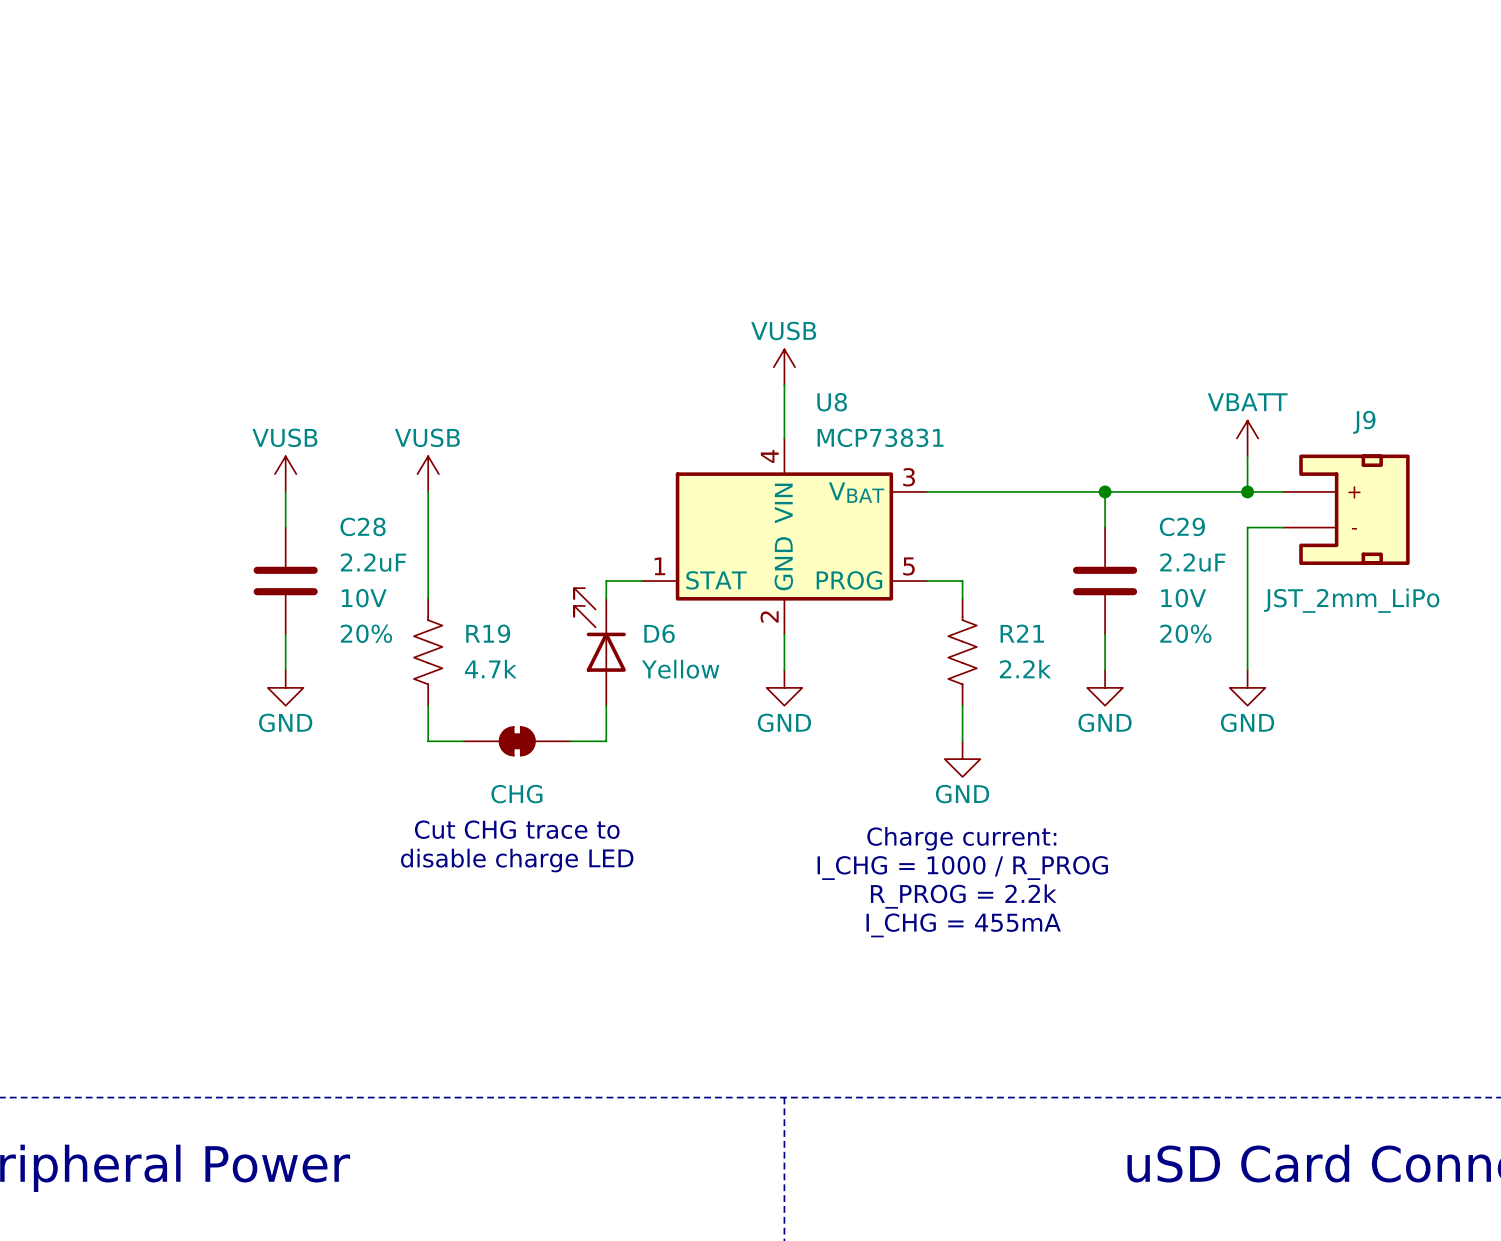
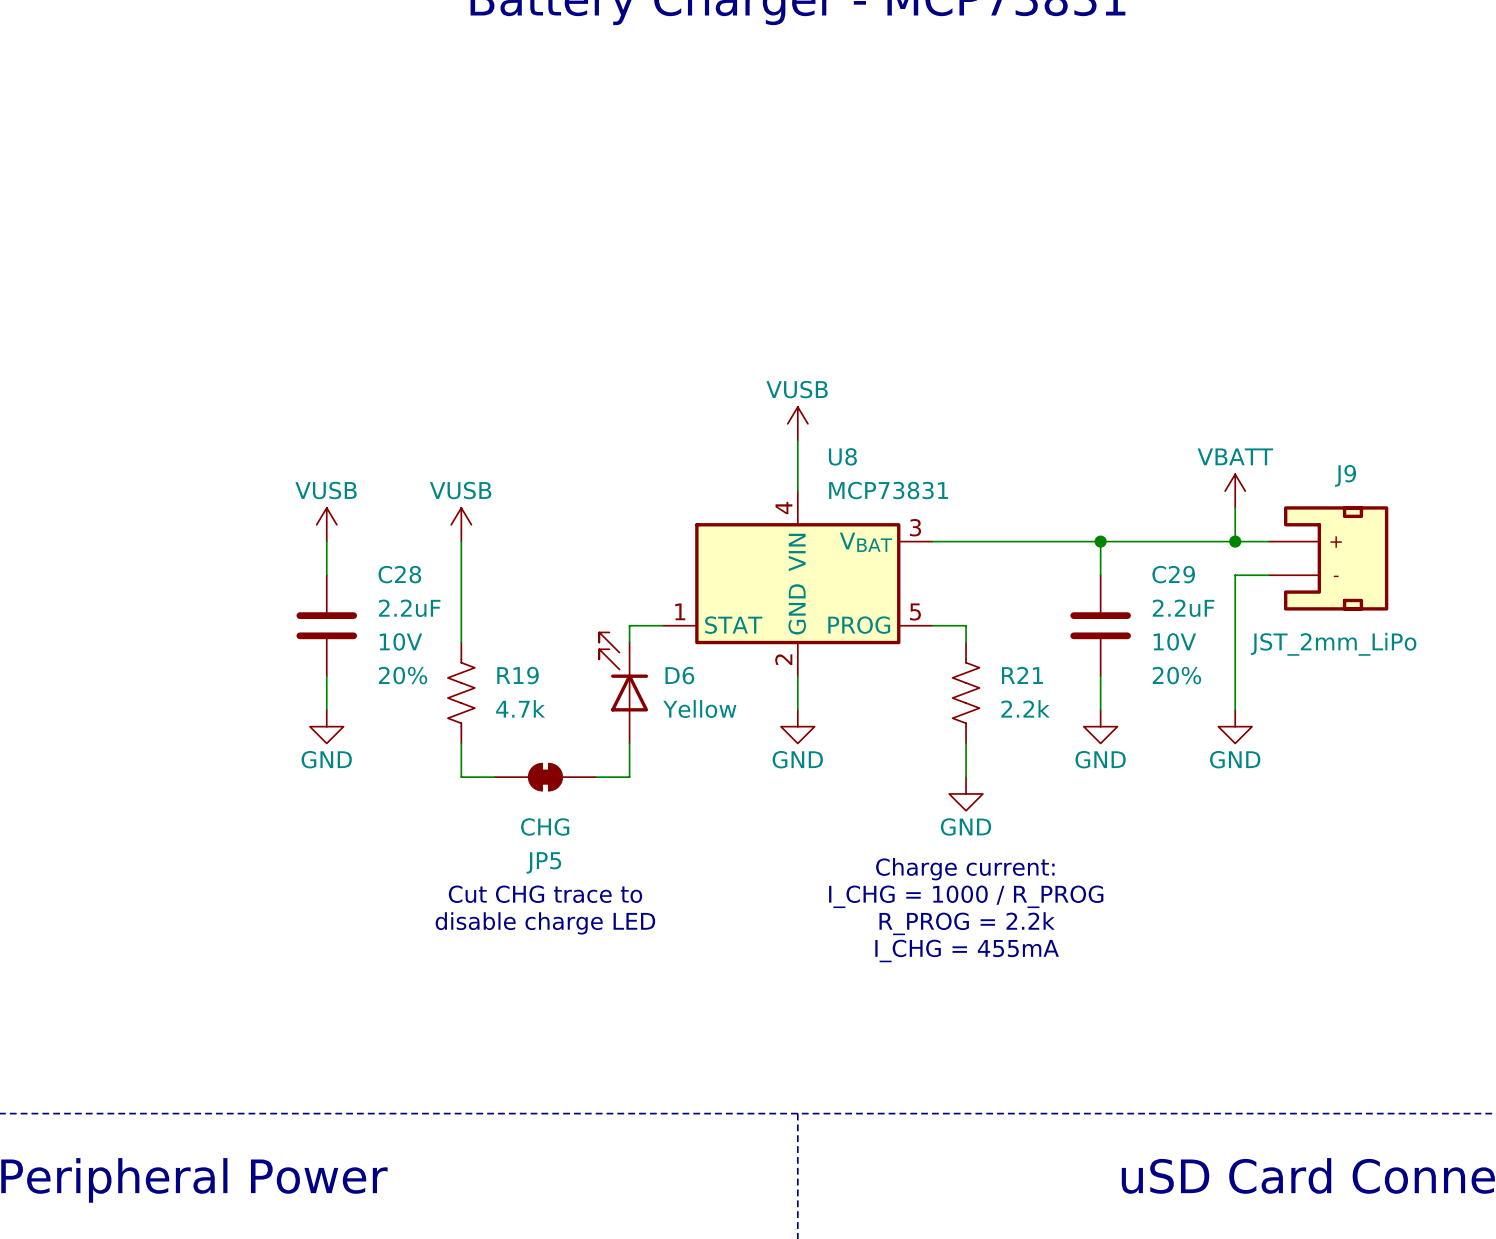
text position: Cut CHG trace to (517, 829) -> Cut CHG trace to (545, 894)
JP5 name: none -> JP5 (543, 862)
text position: disable charge LED (517, 860) -> disable charge LED (545, 923)

